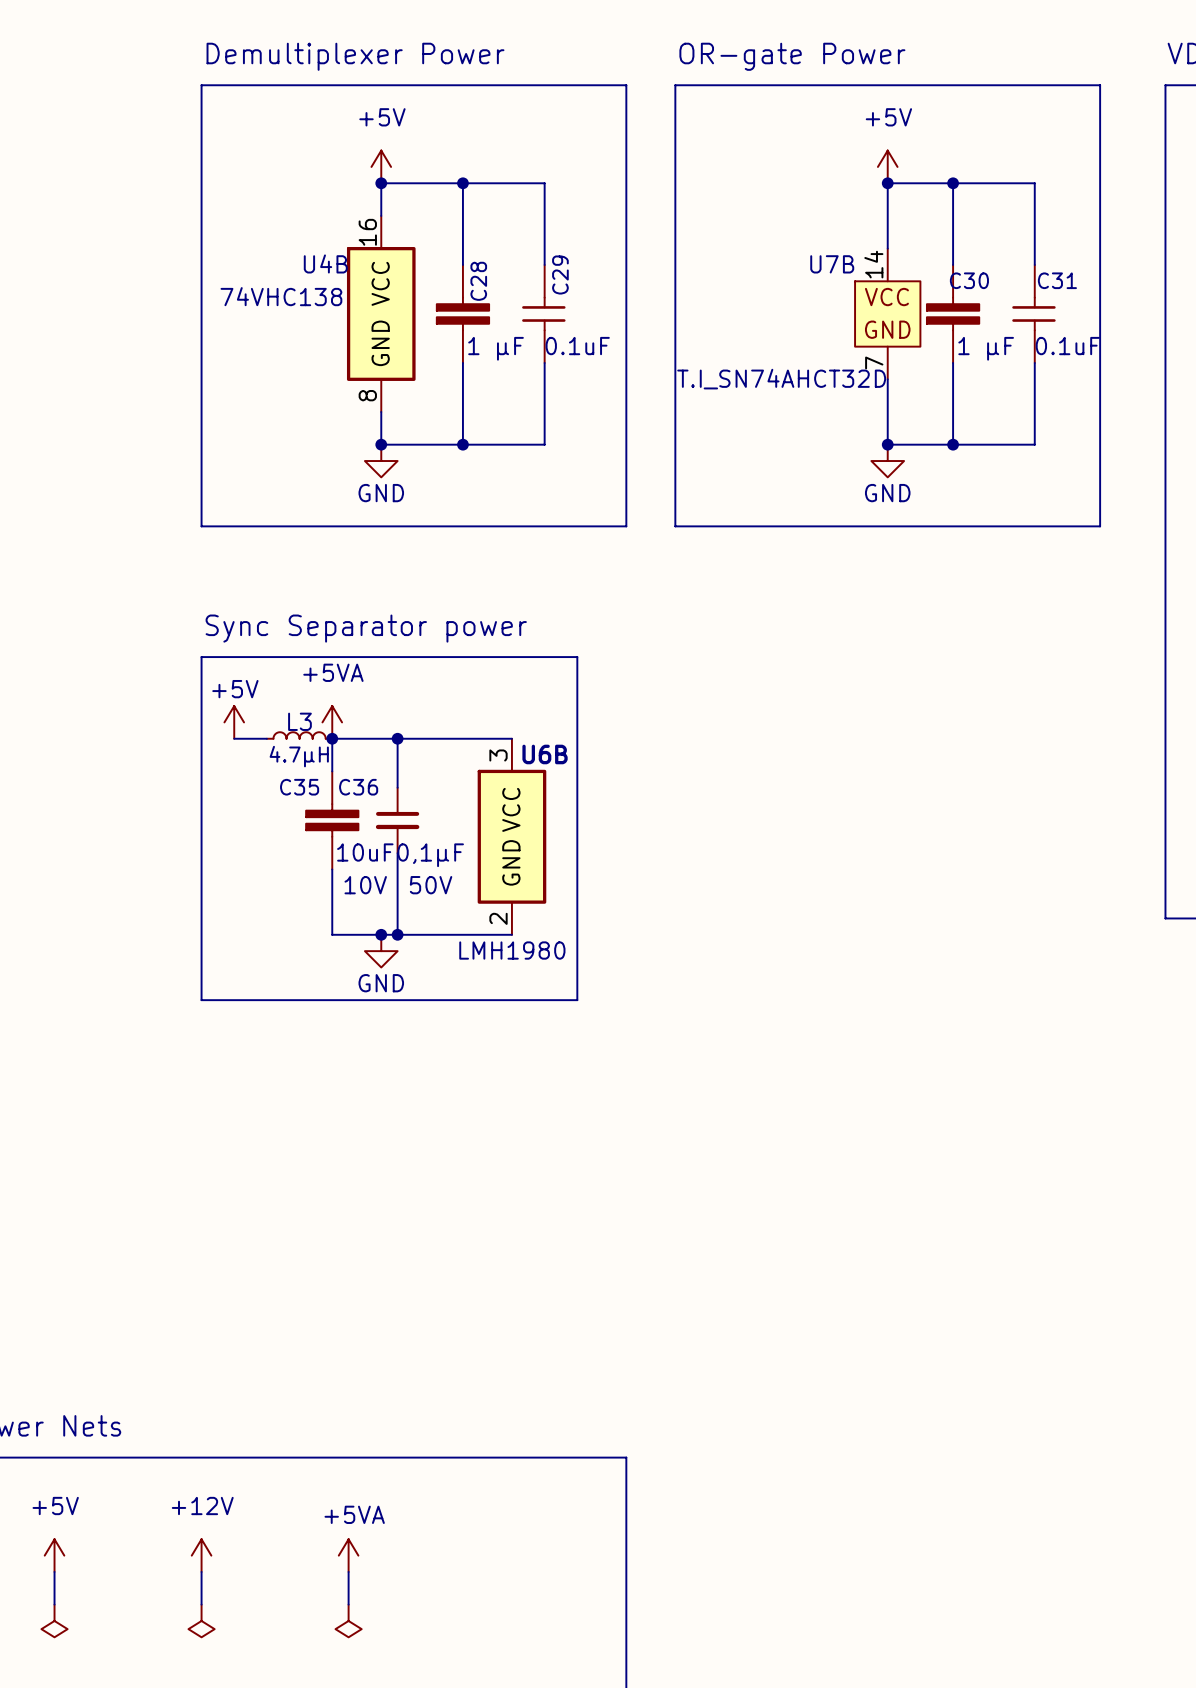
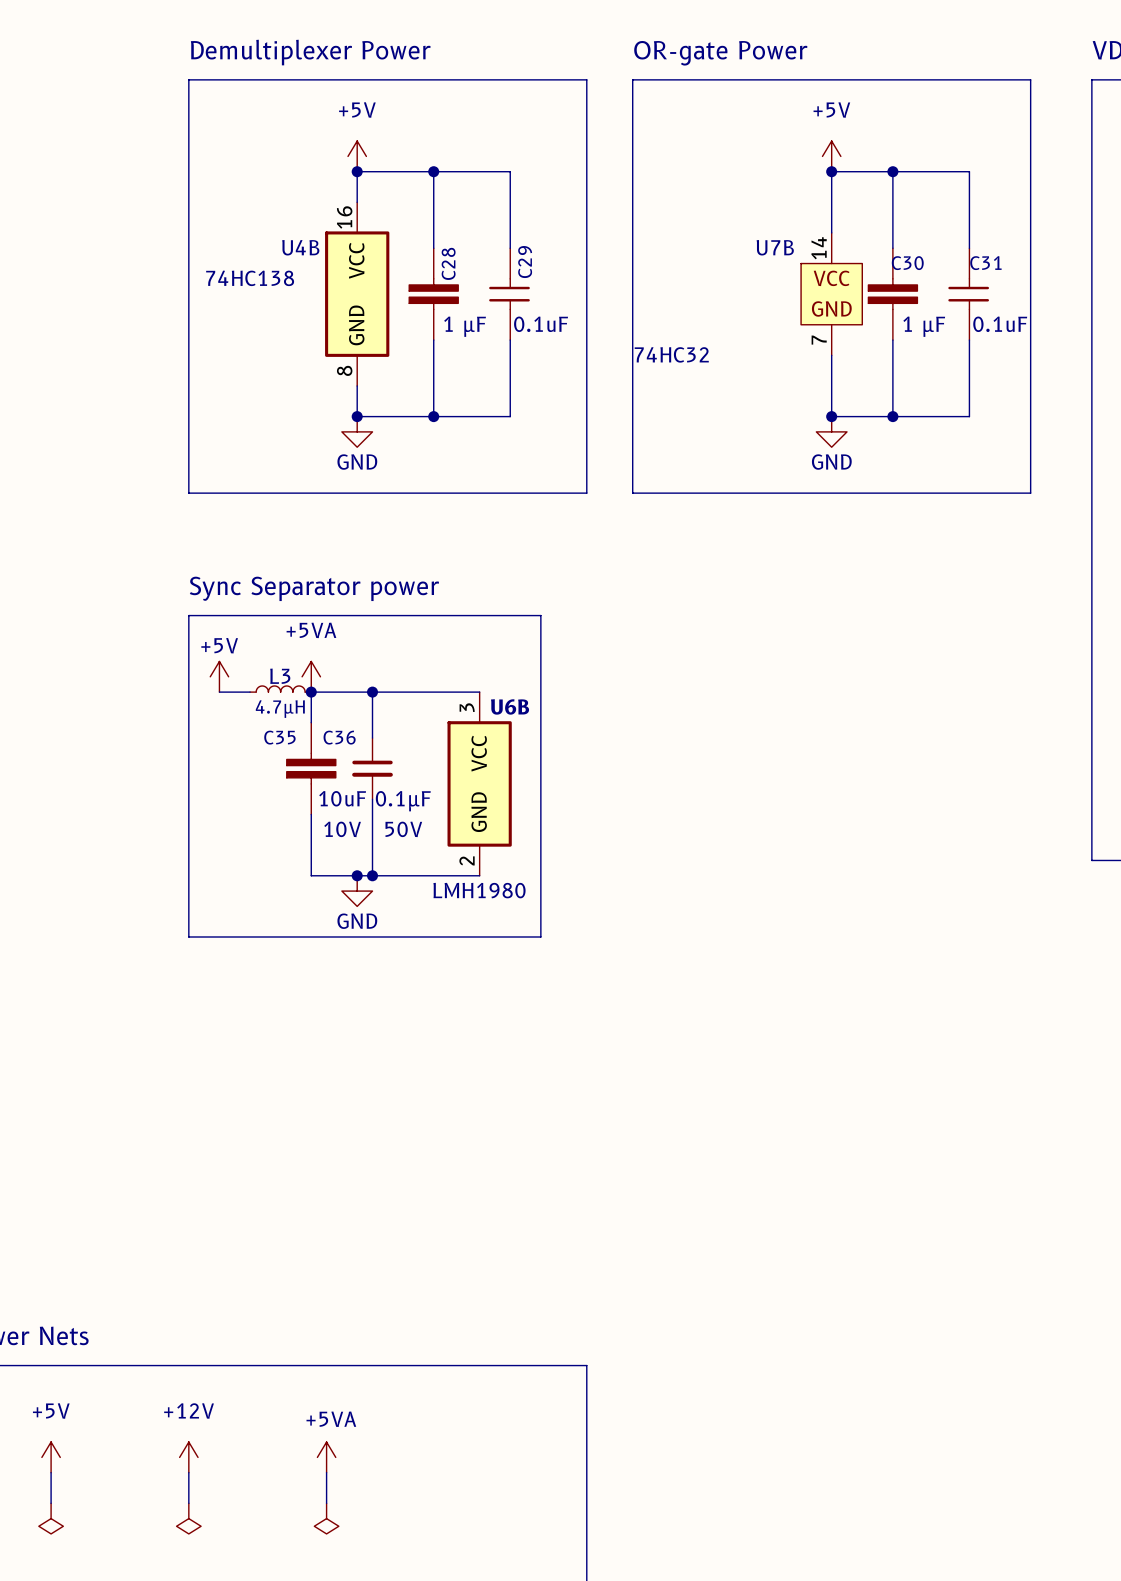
U4B value: 74VHC138 (281, 296) -> 74HC138 (250, 278)
U7B value: T.I_SN74AHCT32D (781, 379) -> 74HC32 (671, 354)
C36 text: 0,1µF (430, 855) -> 0.1µF (403, 801)

